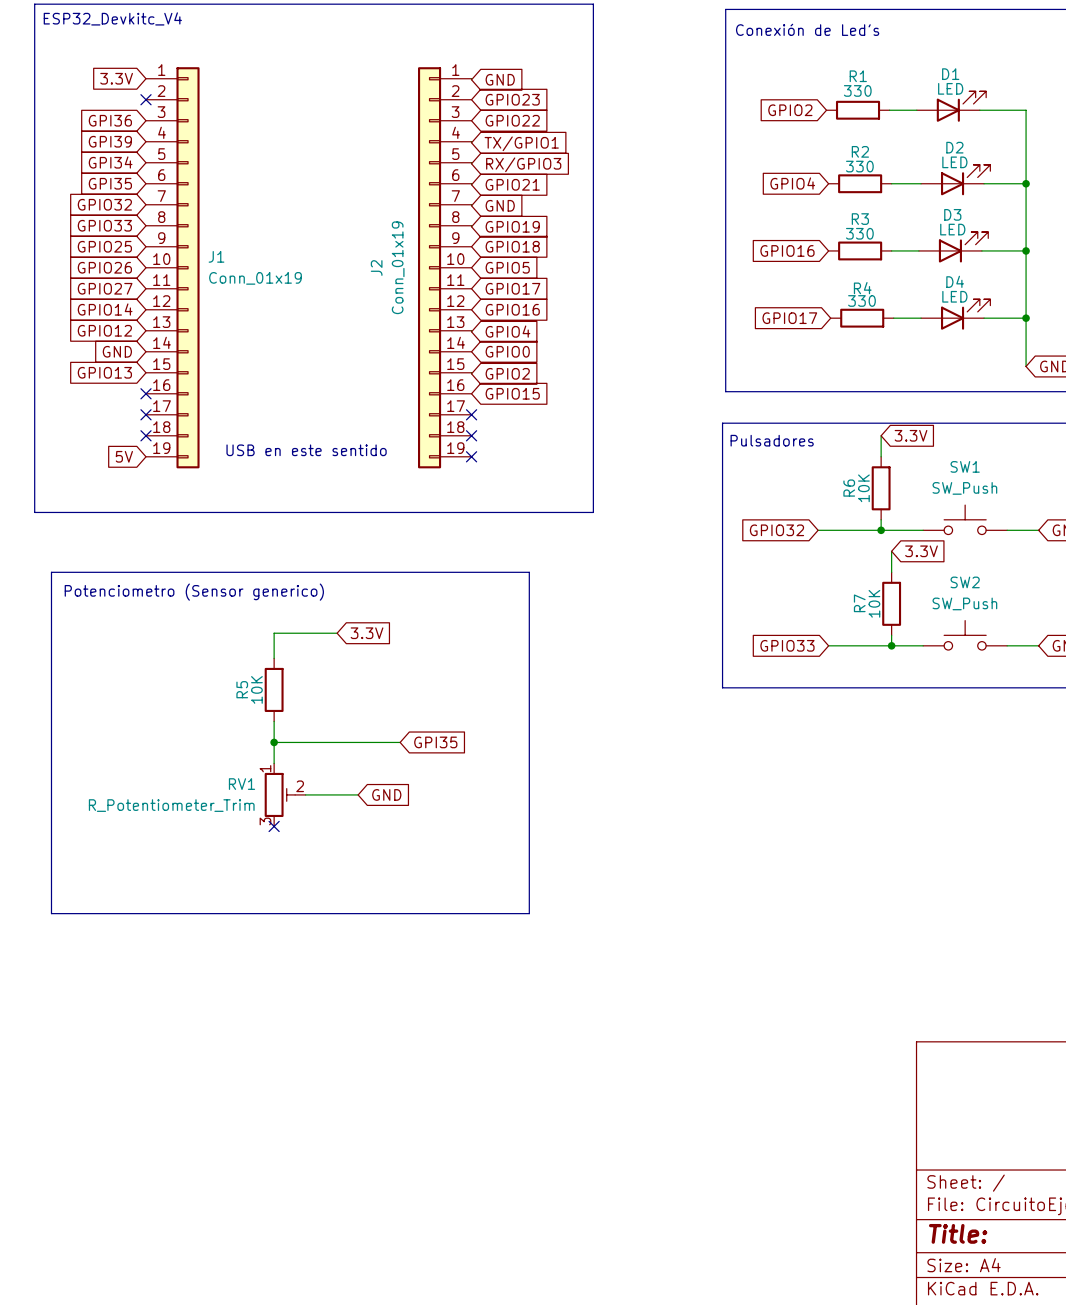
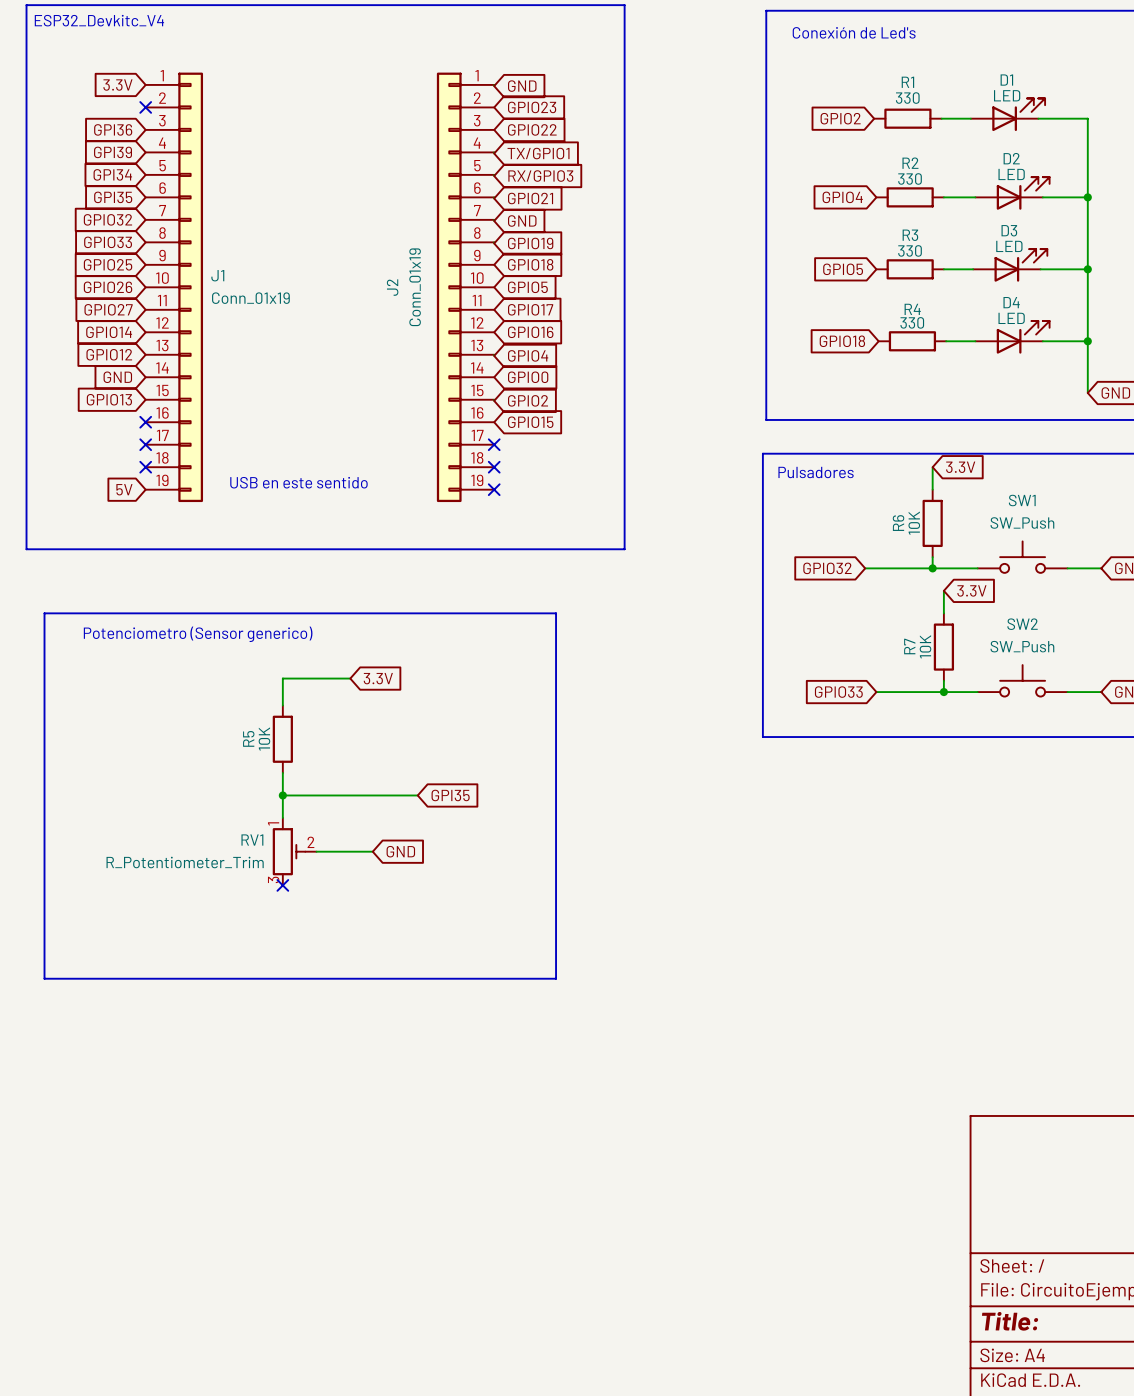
global label: GPIO16 (787, 250) -> GPIO5 (843, 269)
global label: GPIO17 (789, 318) -> GPIO18 (842, 341)

